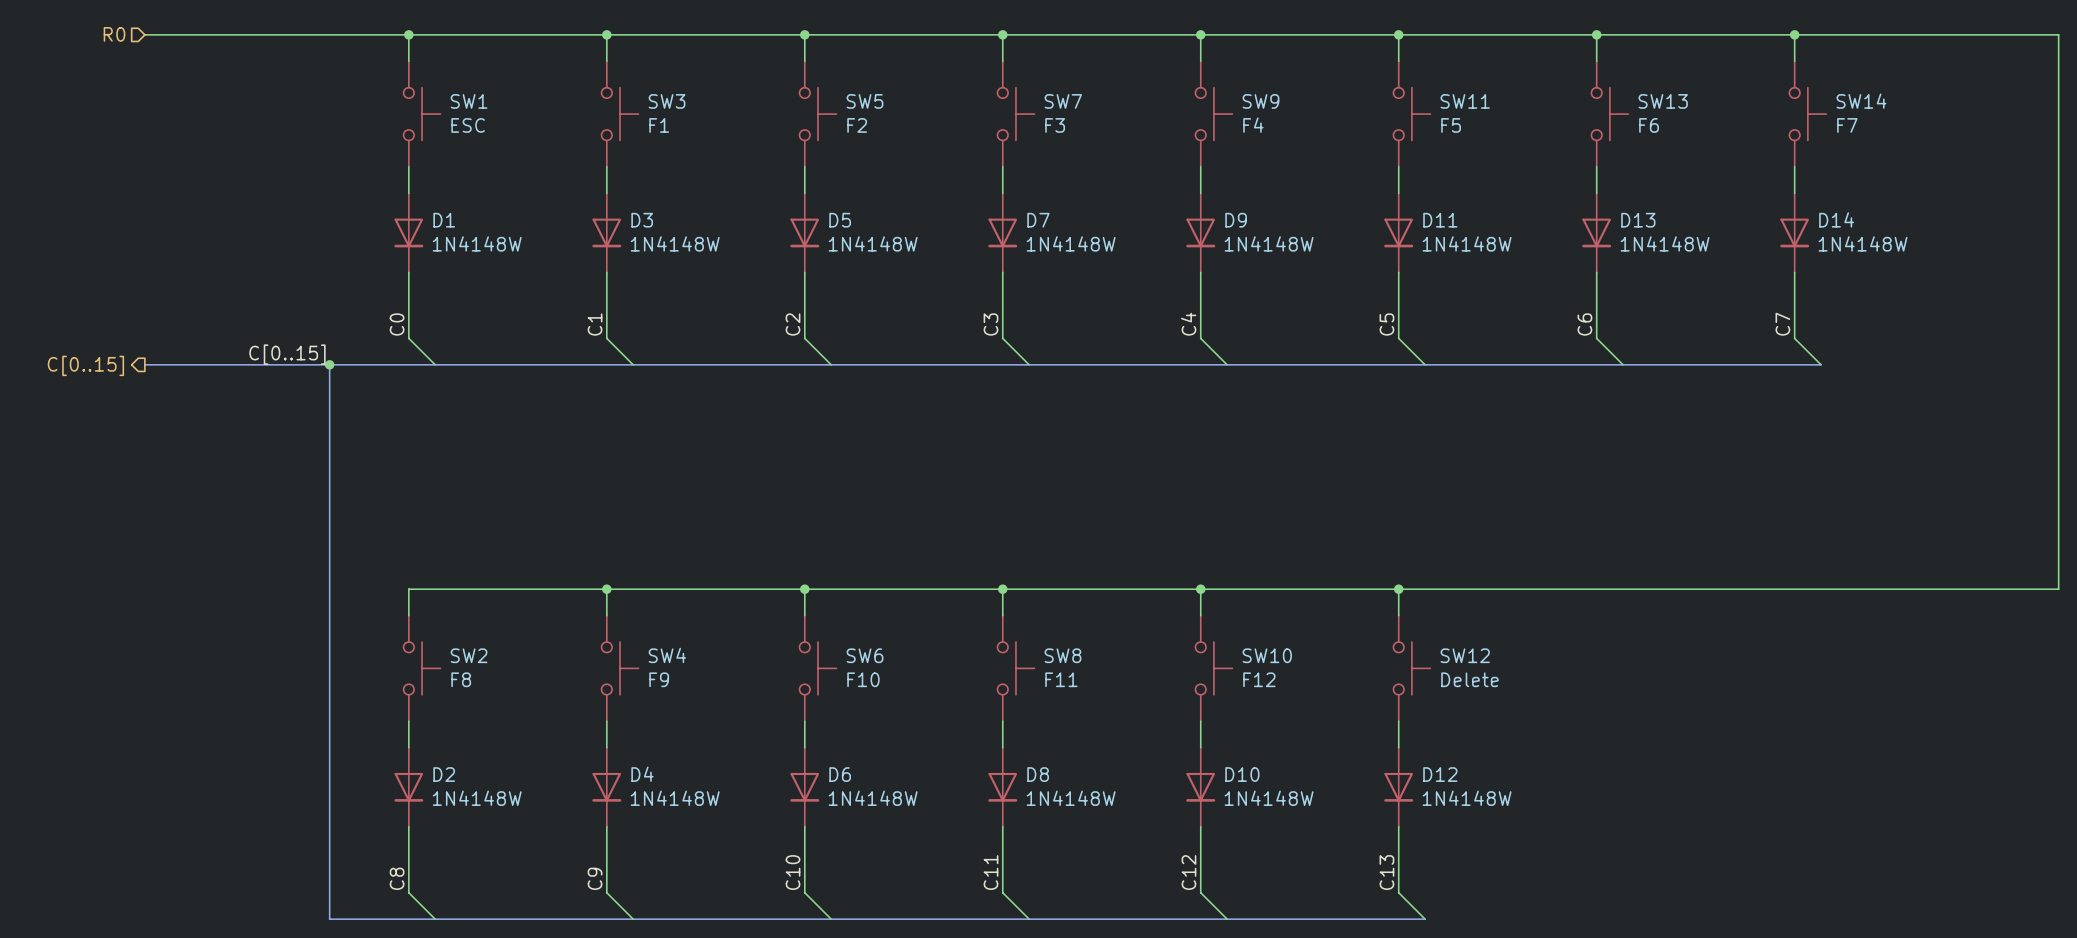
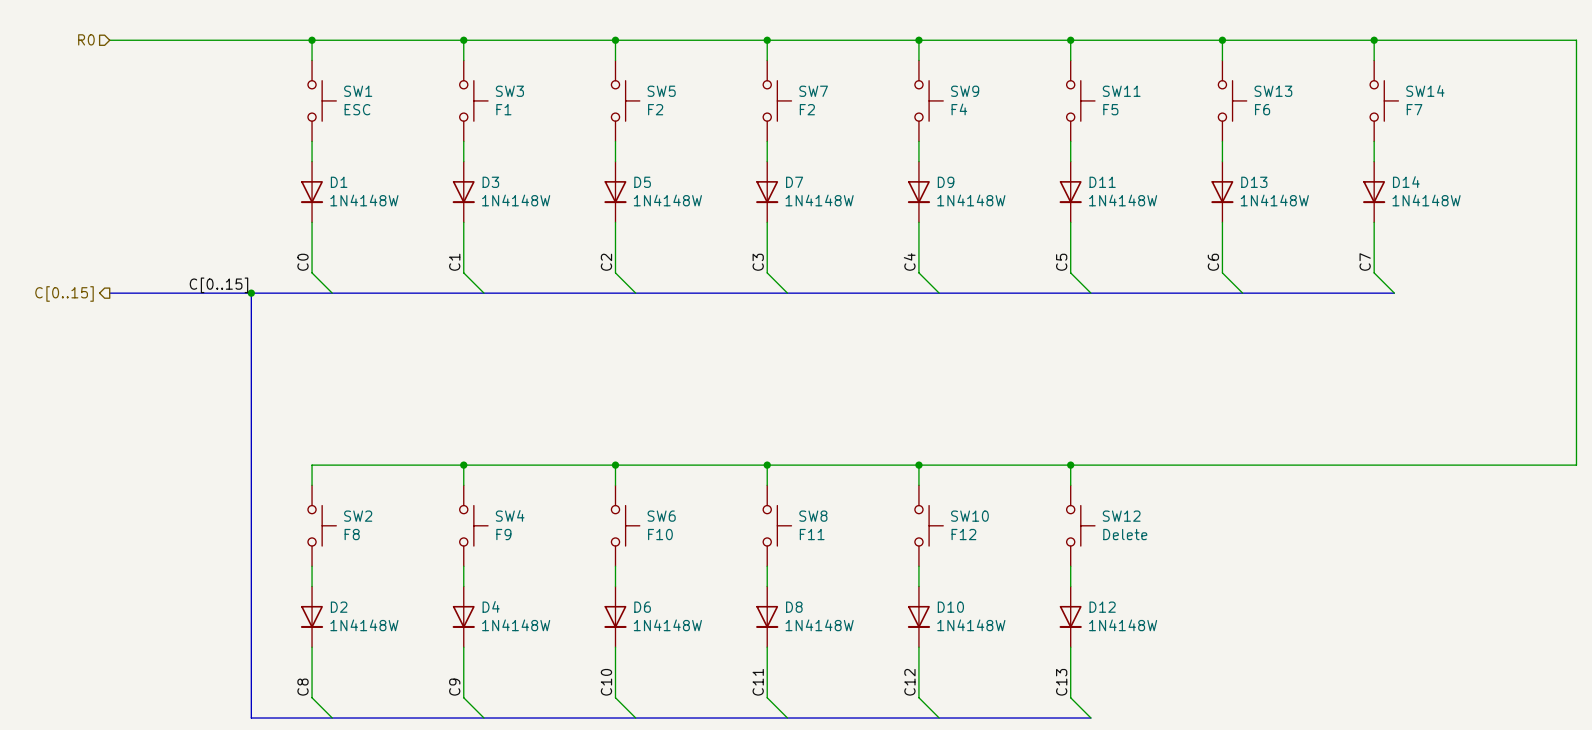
SW7 value: F3 (1055, 125) -> F2 (807, 109)

